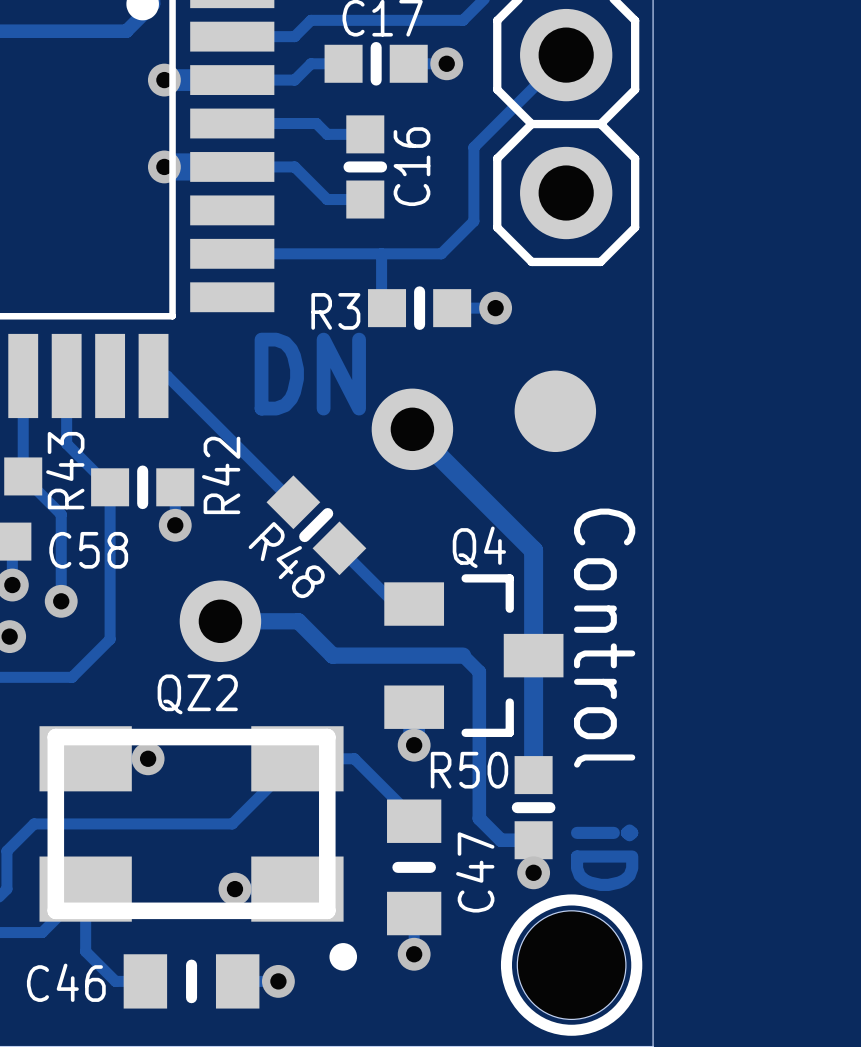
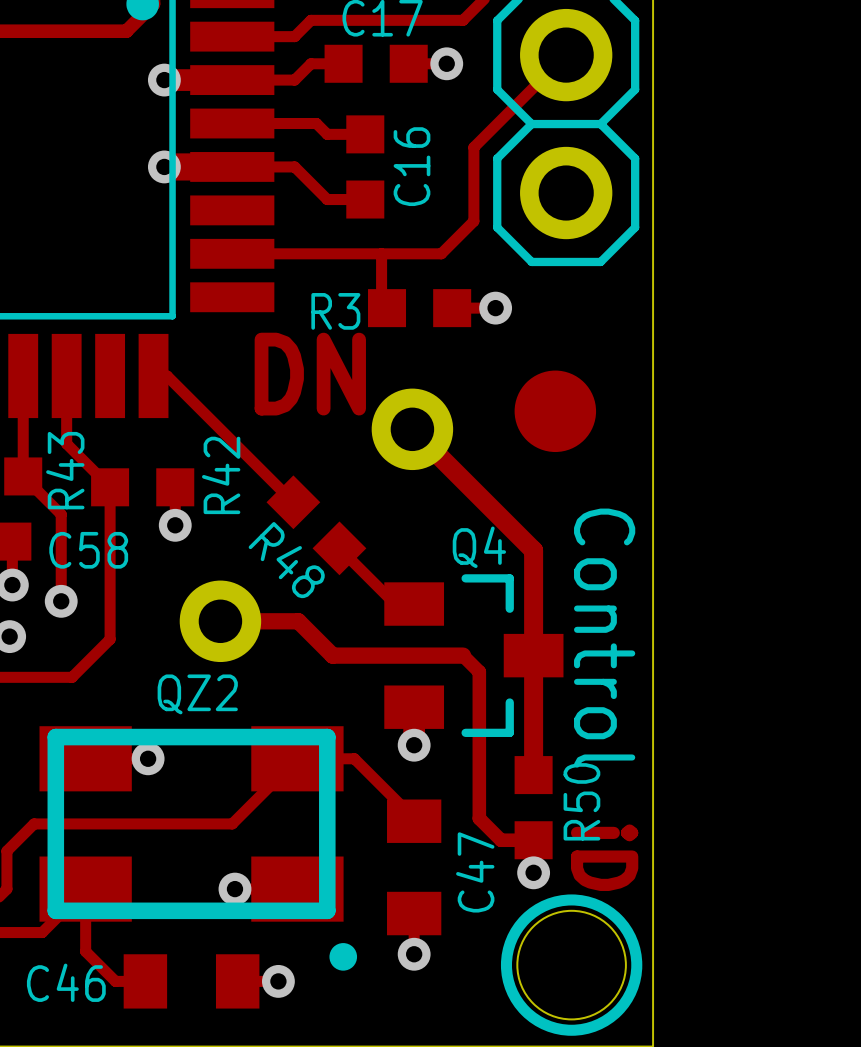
line: (376, 47) (376, 80) -> none
line: (349, 166) (381, 166) -> none
line: (419, 291) (419, 324) -> none
line: (142, 471) (142, 503) -> none
line: (327, 513) (304, 536) -> none
R50 name rotation: 0° (469, 770) -> 90° counterclockwise (581, 801)
R50 name position: R50 (469, 770) -> R50 (581, 801)
line: (517, 807) (549, 807) -> none
line: (397, 867) (430, 867) -> none
line: (191, 965) (191, 997) -> none

